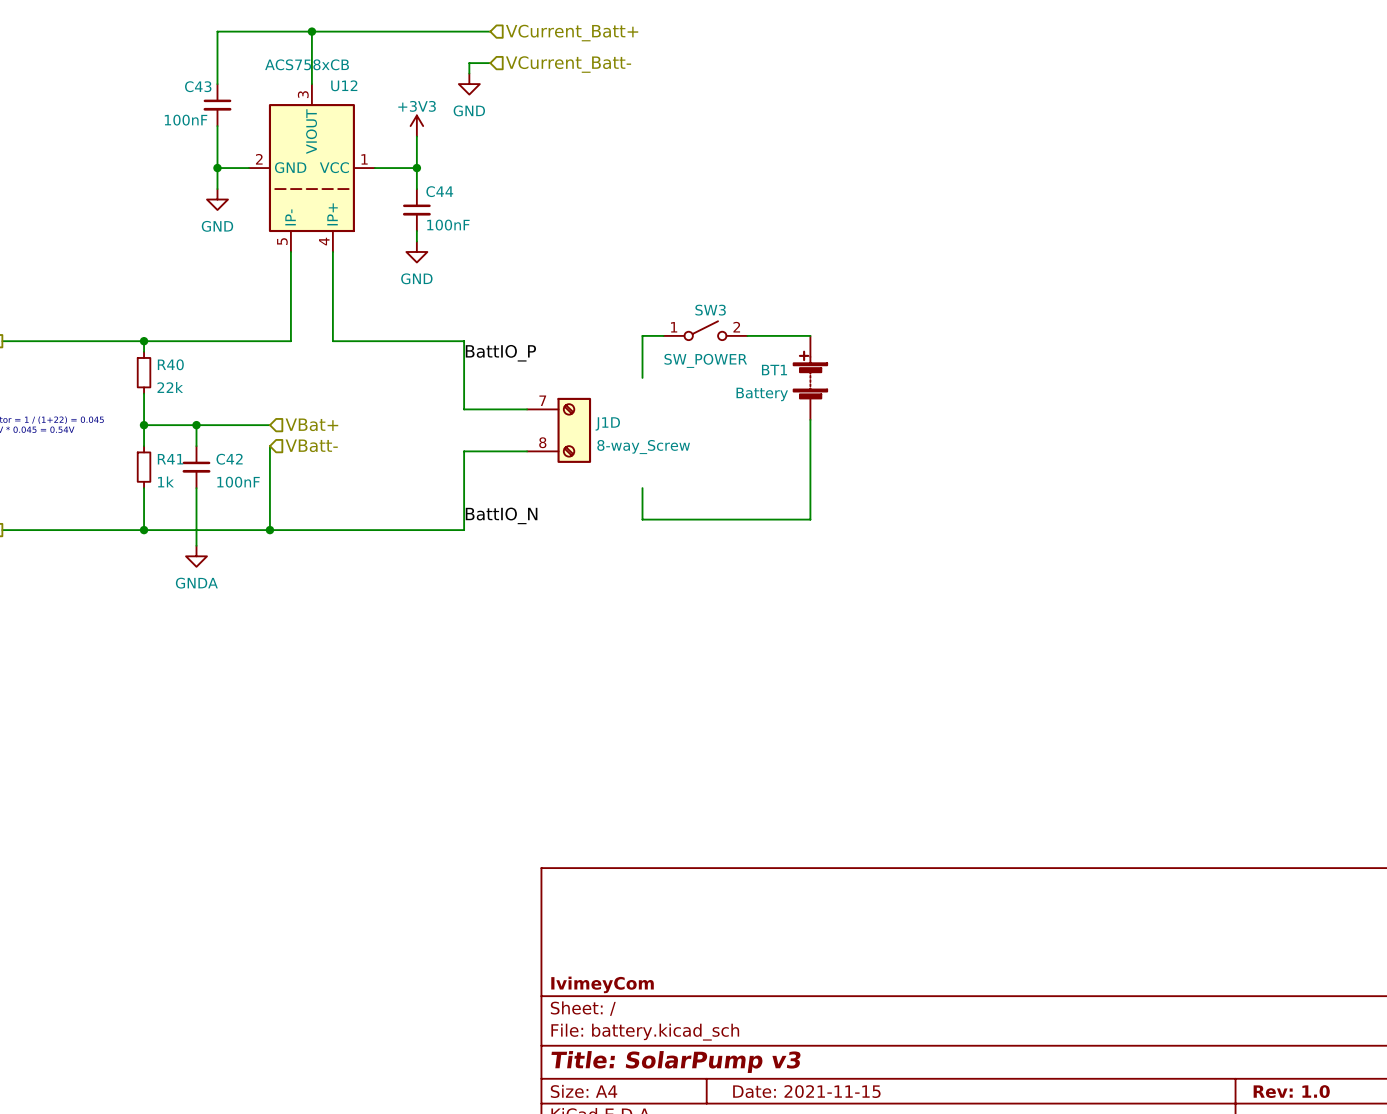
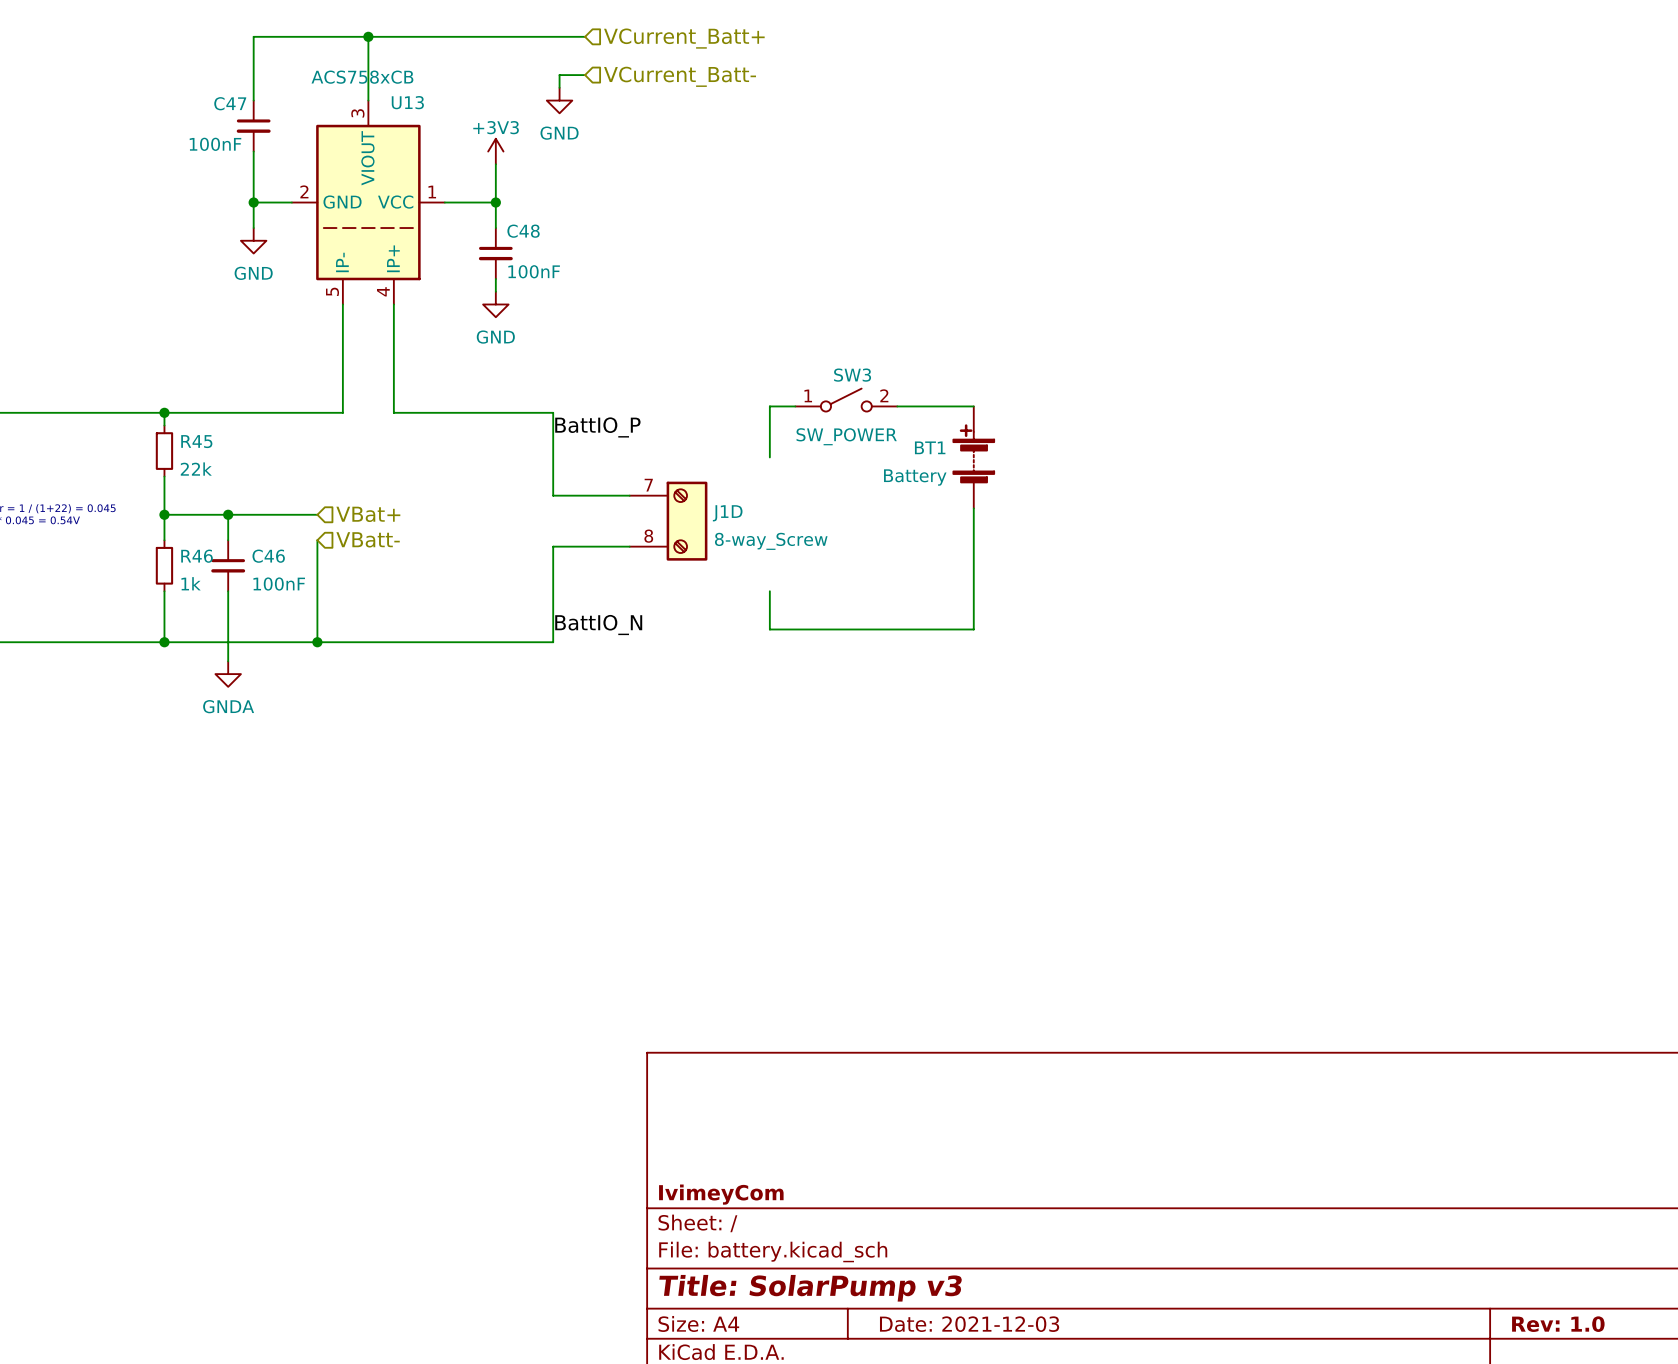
U12 name: U12 (344, 85) -> U13 (407, 102)
C43 name: C43 (198, 86) -> C47 (230, 103)
C44 name: C44 (439, 191) -> C48 (523, 231)
R40 name: R40 (170, 364) -> R45 (196, 441)
R41 name: R41 (170, 459) -> R46 (197, 556)
C42 name: C42 (229, 459) -> C46 (268, 556)
title block: Date: 2021-11-15 (806, 1091) -> Date: 2021-12-03 (969, 1324)

